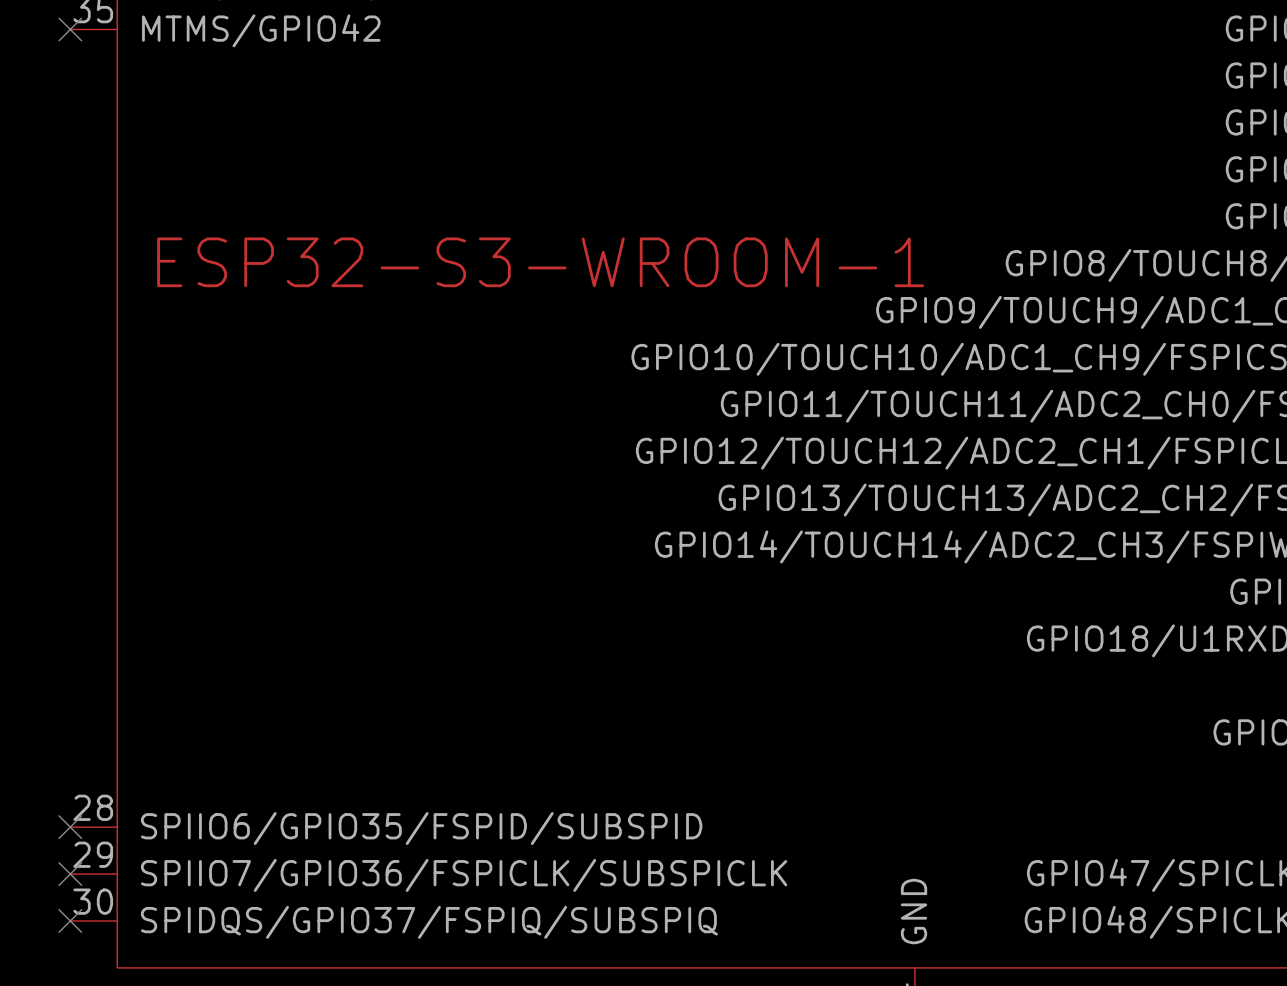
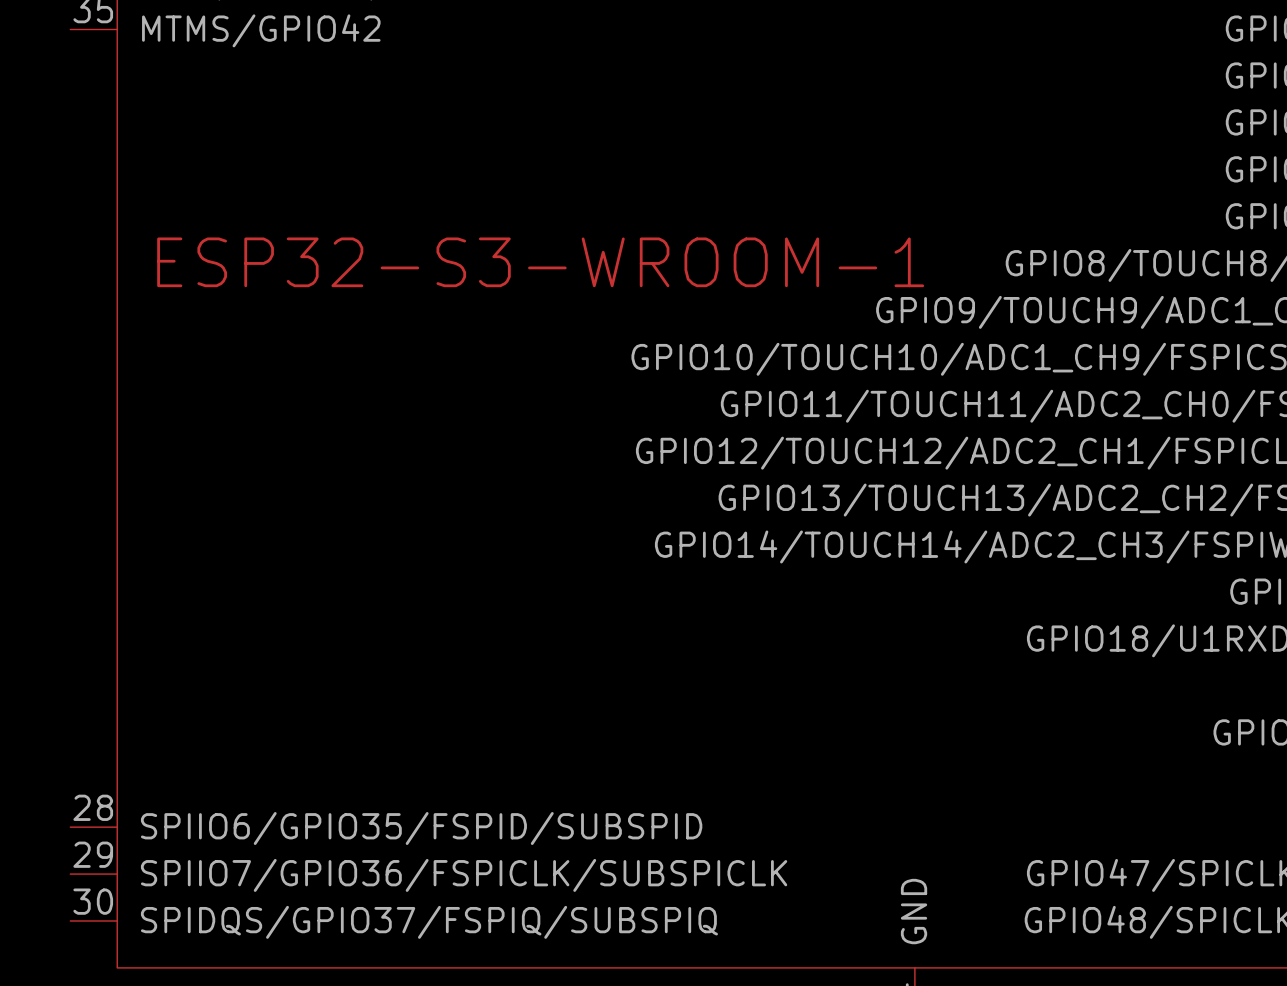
no-connect mark: (70, 29) -> none
no-connect mark: (70, 827) -> none
no-connect mark: (70, 874) -> none
no-connect mark: (70, 920) -> none

